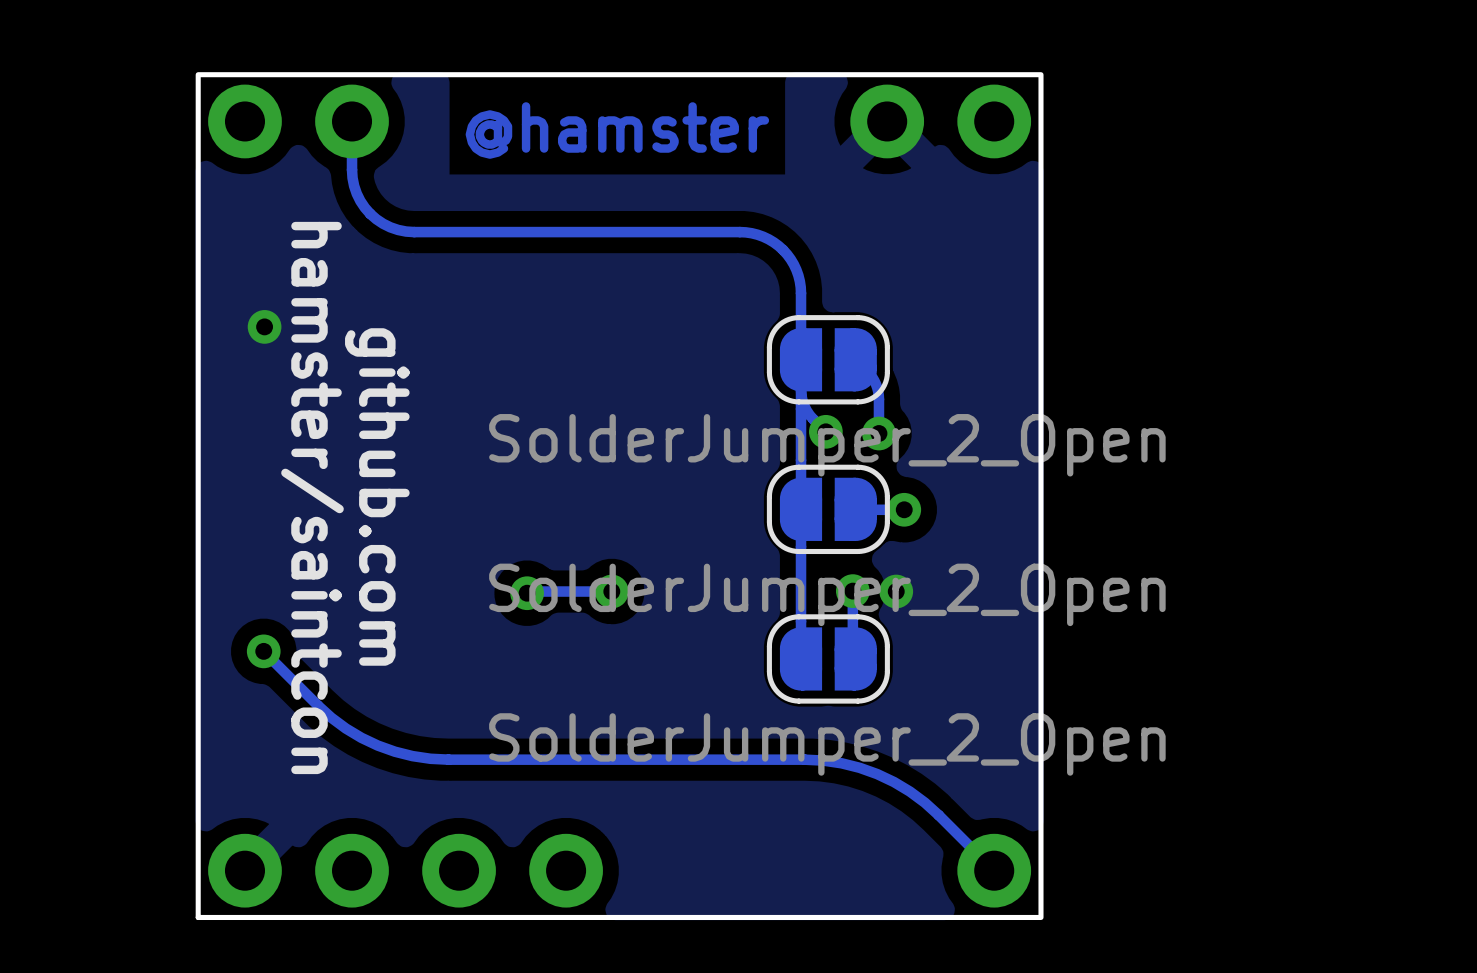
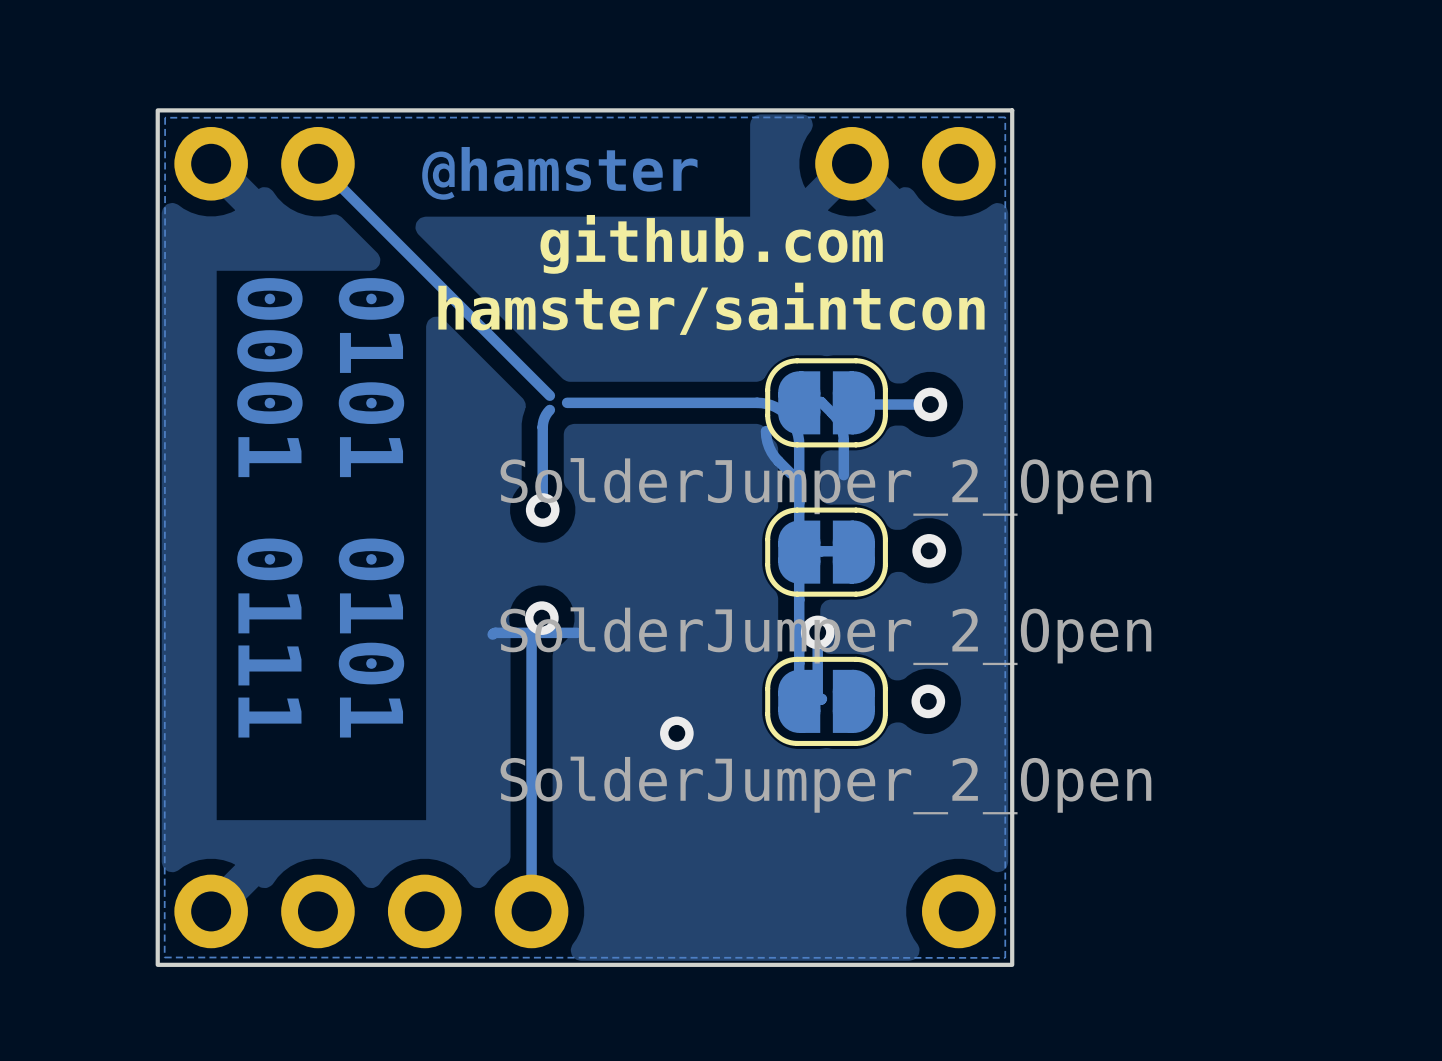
part footprint: [195, 72, 1044, 921] -> [155, 108, 1015, 967]
track: (352, 121) (352, 177) (356, 193) (370, 213) (383, 223) (398, 229) (414, 232) (745, 232) (768, 239) (787, 254) (798, 275) (801, 293) (801, 658) -> (317, 163) (549, 395)
via: (264, 326) -> none
part position: (828, 359) -> (826, 402)
track: none -> (567, 402) (761, 403) (779, 409) (790, 418) (796, 431) (799, 444) (799, 701)
track: none -> (853, 402) (856, 404) (930, 404)
via: none -> (930, 404)
track: none -> (549, 409) (542, 424) (542, 510)
via: (825, 431) -> none
via: (878, 433) -> none
via: none -> (542, 510)
text rotation: 0° (377, 496) -> 90° counterclockwise (711, 244)
text position: github.com (377, 496) -> github.com (711, 244)
text rotation: 0° (312, 497) -> 90° counterclockwise (711, 308)
text: none -> 0001 0111 (269, 507)
text: none -> 0101 0101 (371, 507)
part position: (828, 509) -> (826, 552)
via: (904, 509) -> none
via: none -> (929, 550)
track: none -> (541, 618) (533, 626) (531, 635) (531, 911)
via: none -> (541, 618)
via: (611, 591) -> none
via: (896, 591) -> none
via: (527, 593) -> none
track: (263, 651) (317, 705) (345, 728) (377, 745) (412, 756) (448, 759) (804, 759) (823, 760) (859, 767) (894, 782) (924, 802) (994, 870) -> none
via: (263, 651) -> none
part position: (828, 658) -> (826, 701)
via: none -> (928, 701)
via: none -> (676, 733)

